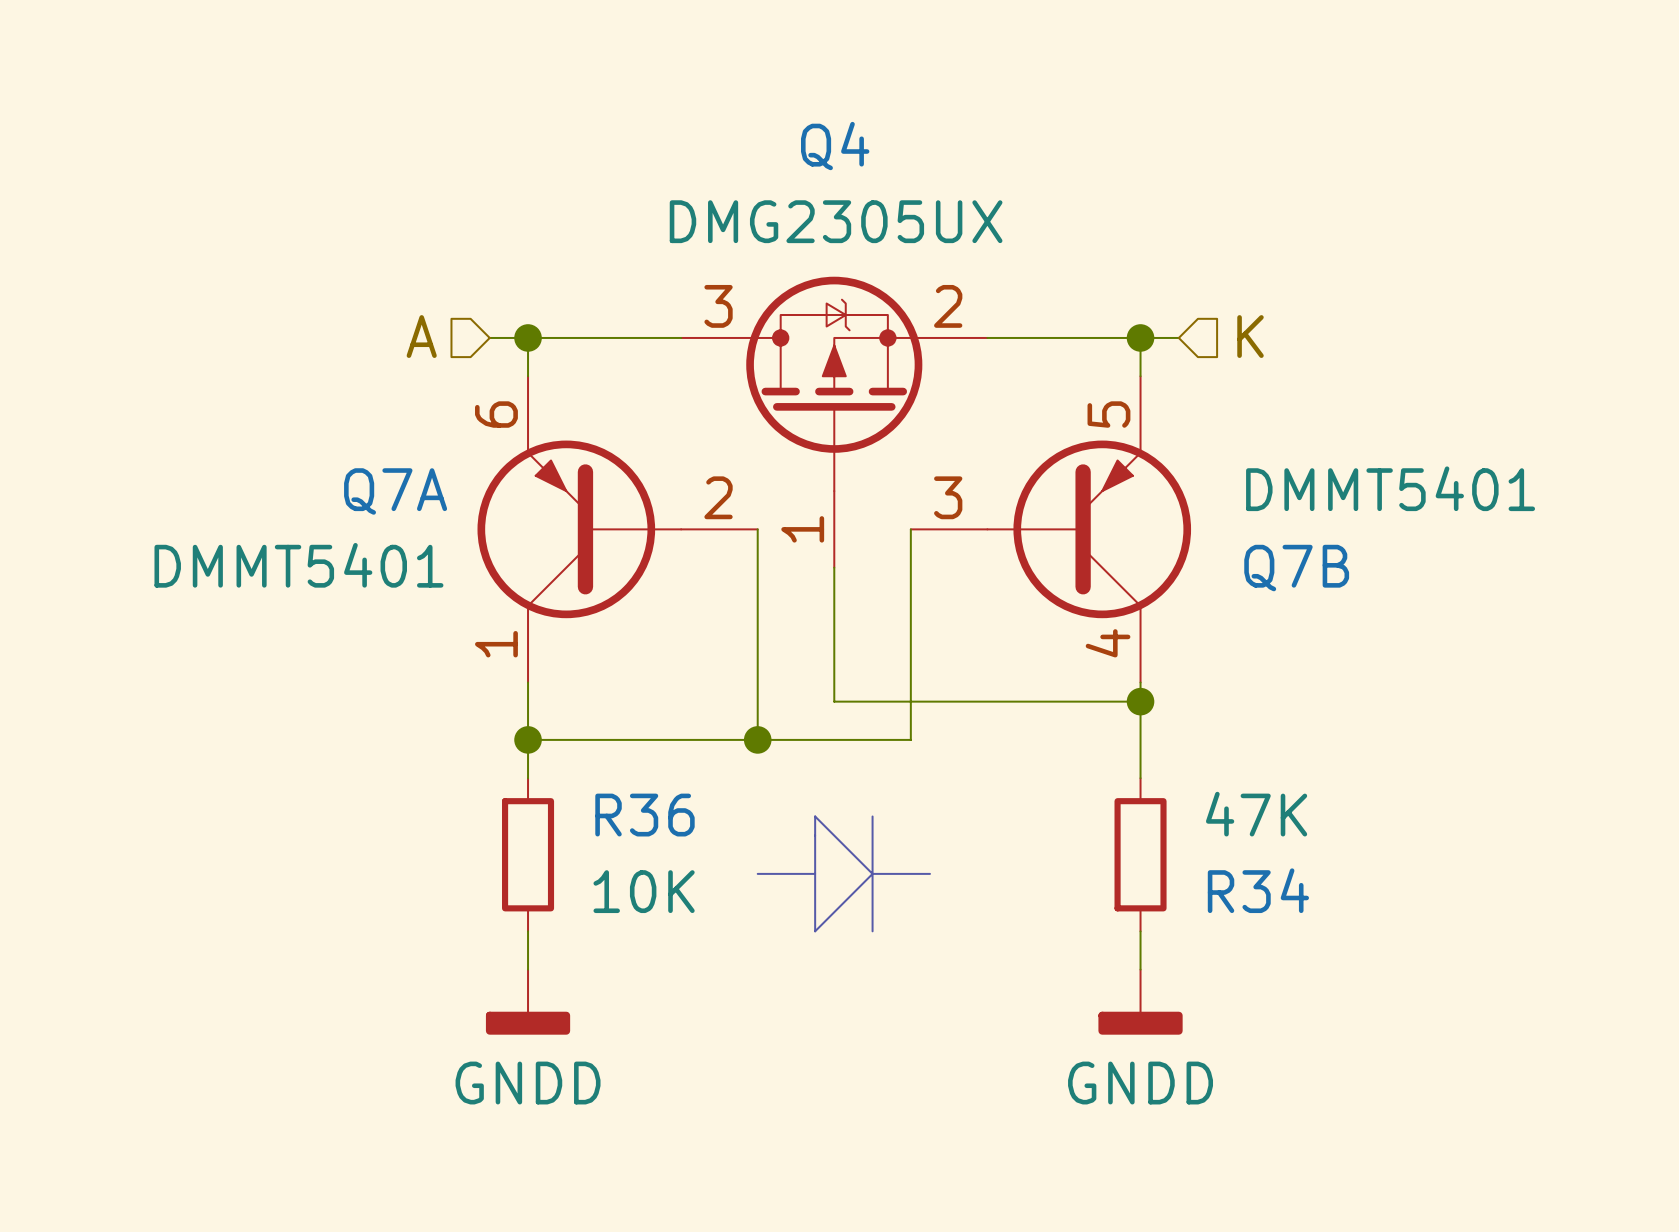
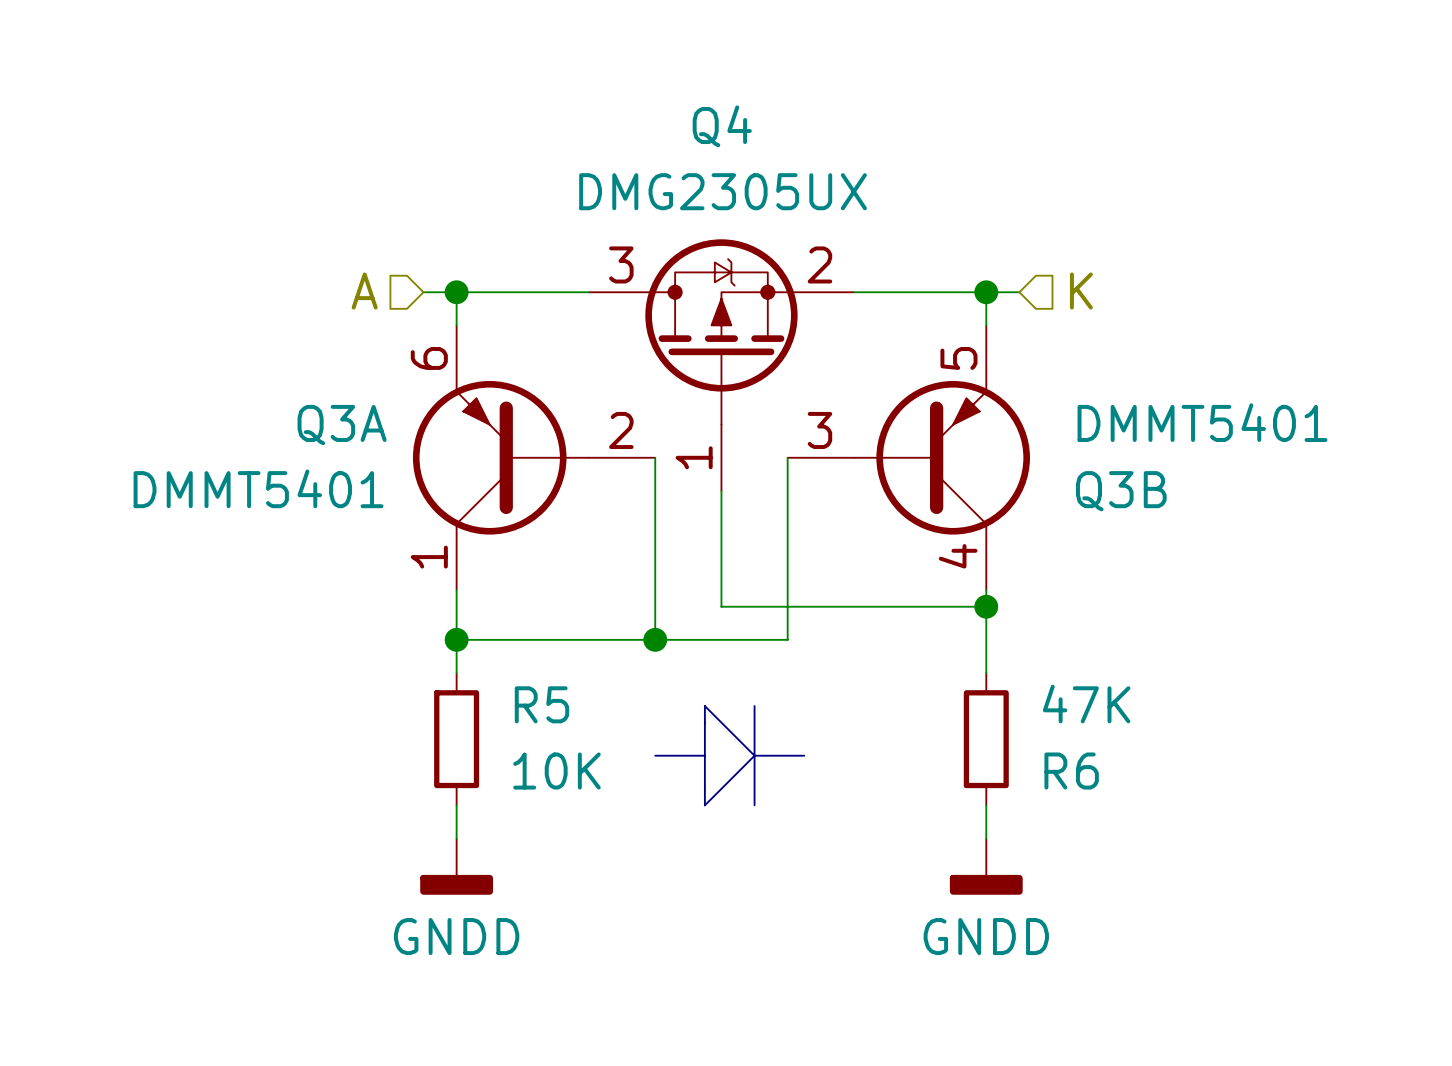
Q7A name: Q7A (395, 491) -> Q3A (342, 425)
Q7B name: Q7B (1296, 568) -> Q3B (1121, 491)
R36 name: R36 (644, 815) -> R5 (541, 704)
R34 name: R34 (1258, 890) -> R6 (1071, 771)

